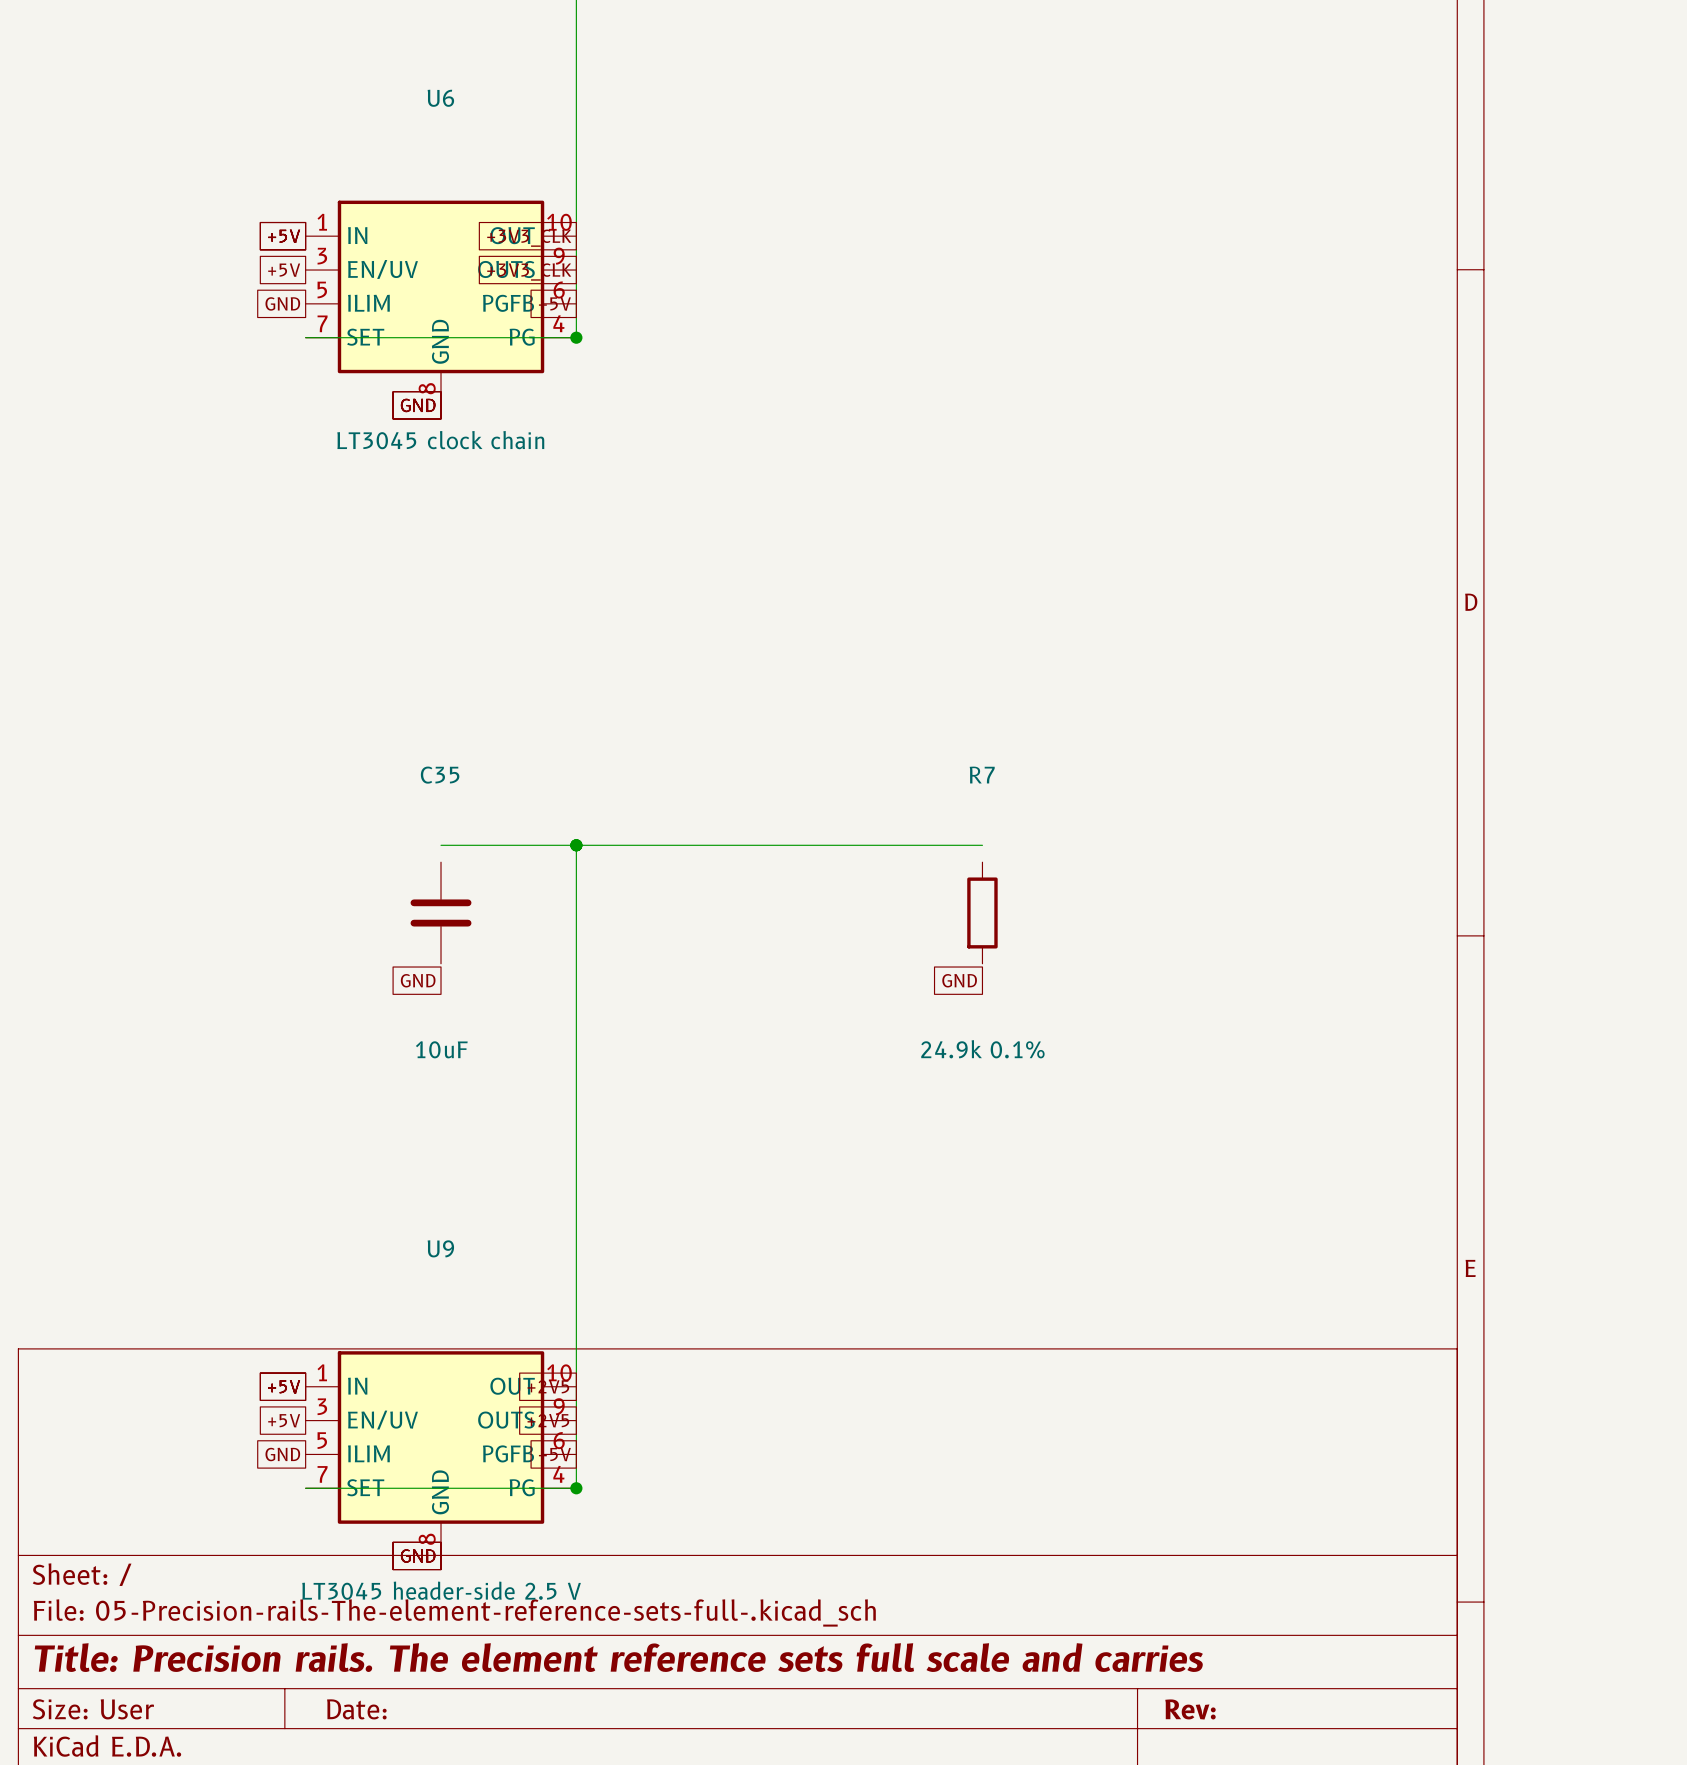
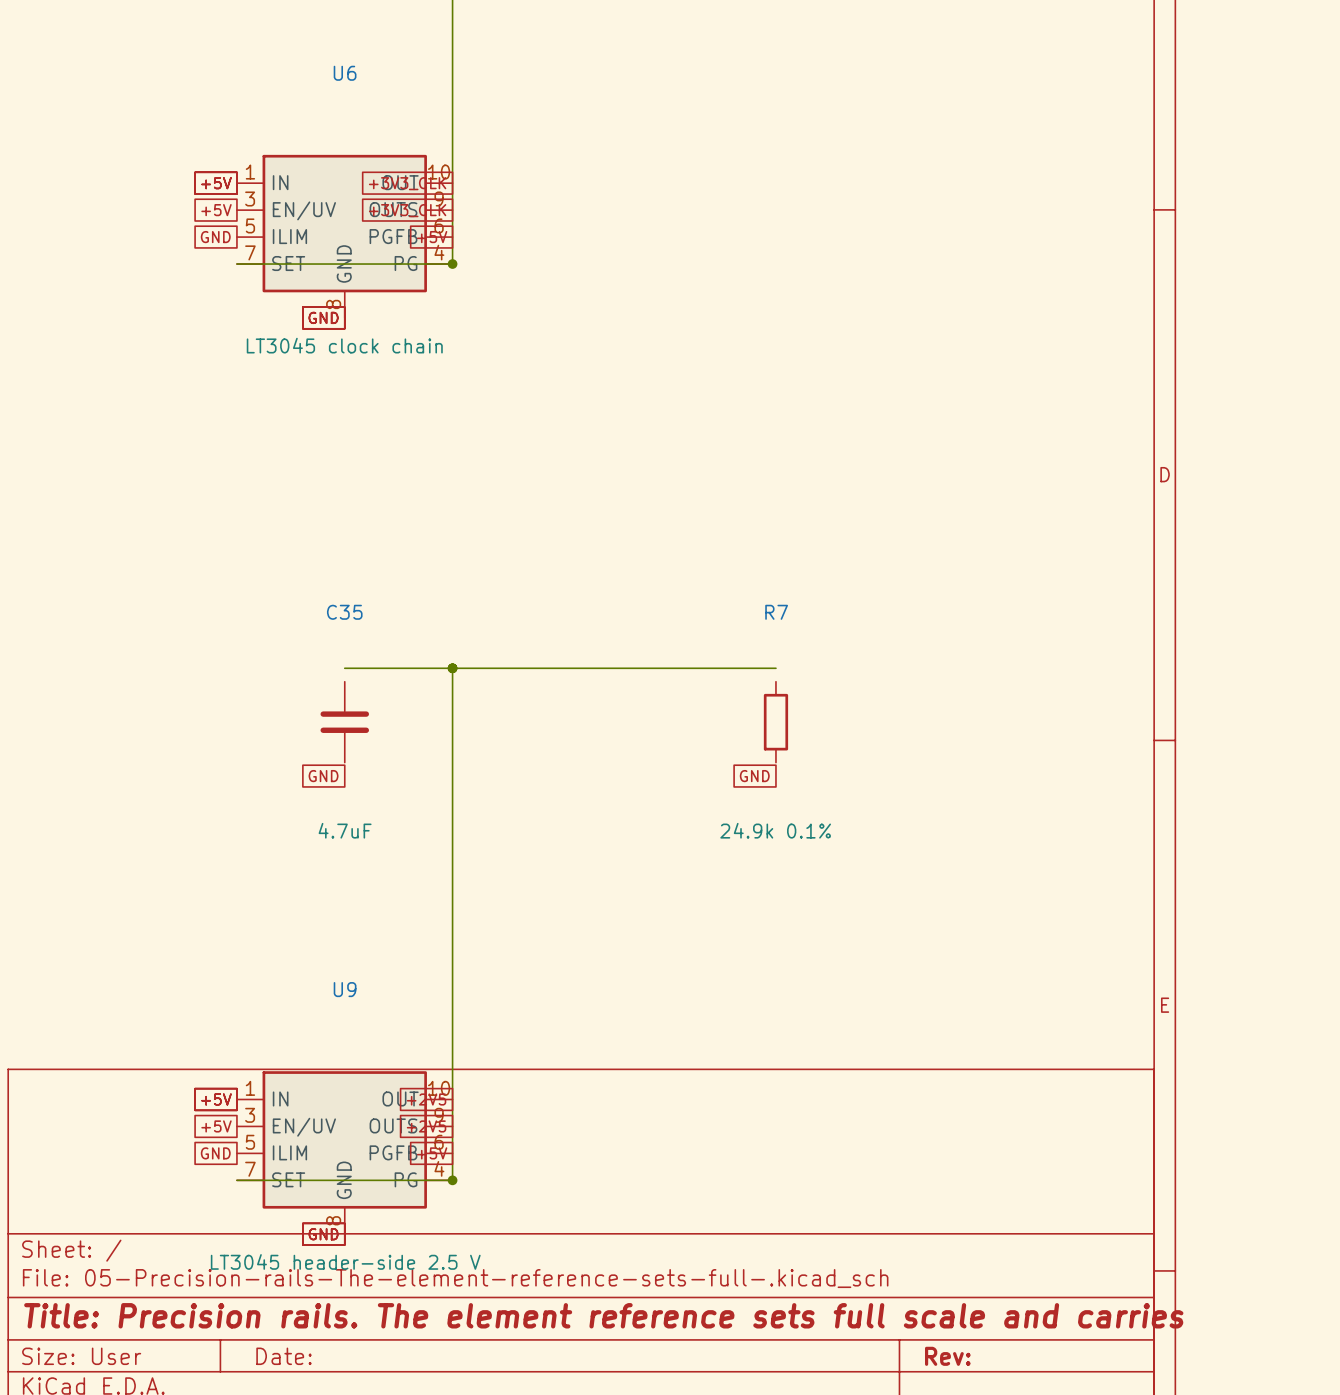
C35 value: 10uF (441, 1049) -> 4.7uF (345, 830)

